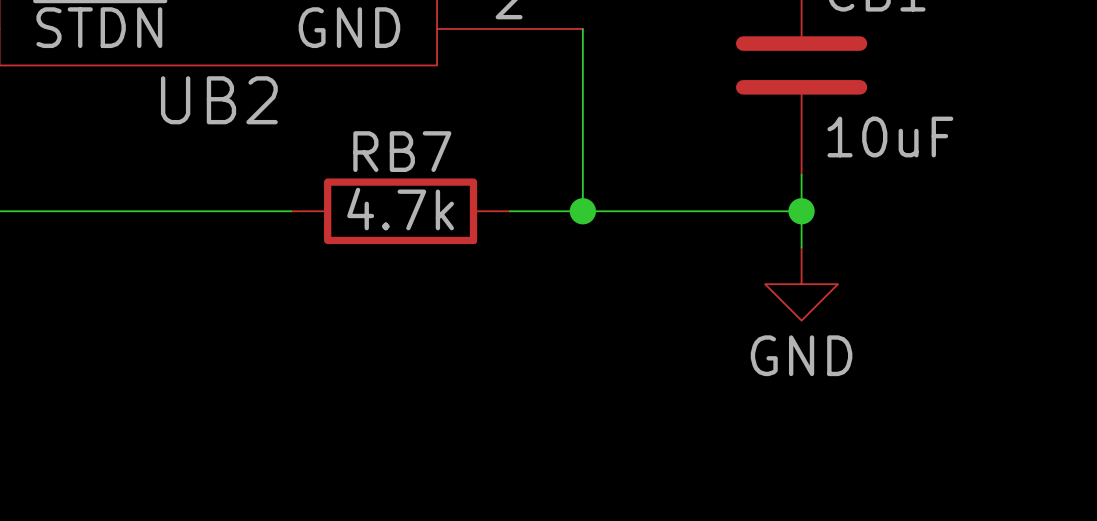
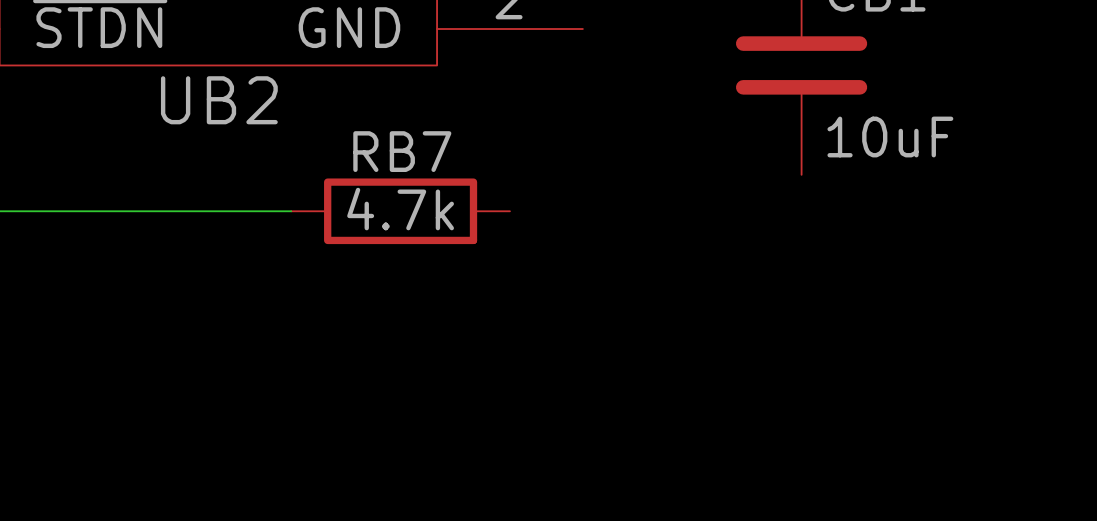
wire: (582, 29) (582, 211) -> none
wire: (801, 174) (801, 247) -> none
wire: (509, 211) (801, 211) -> none
junction: (582, 211) -> none
junction: (801, 211) -> none
power symbol: GND (801, 284) -> none

